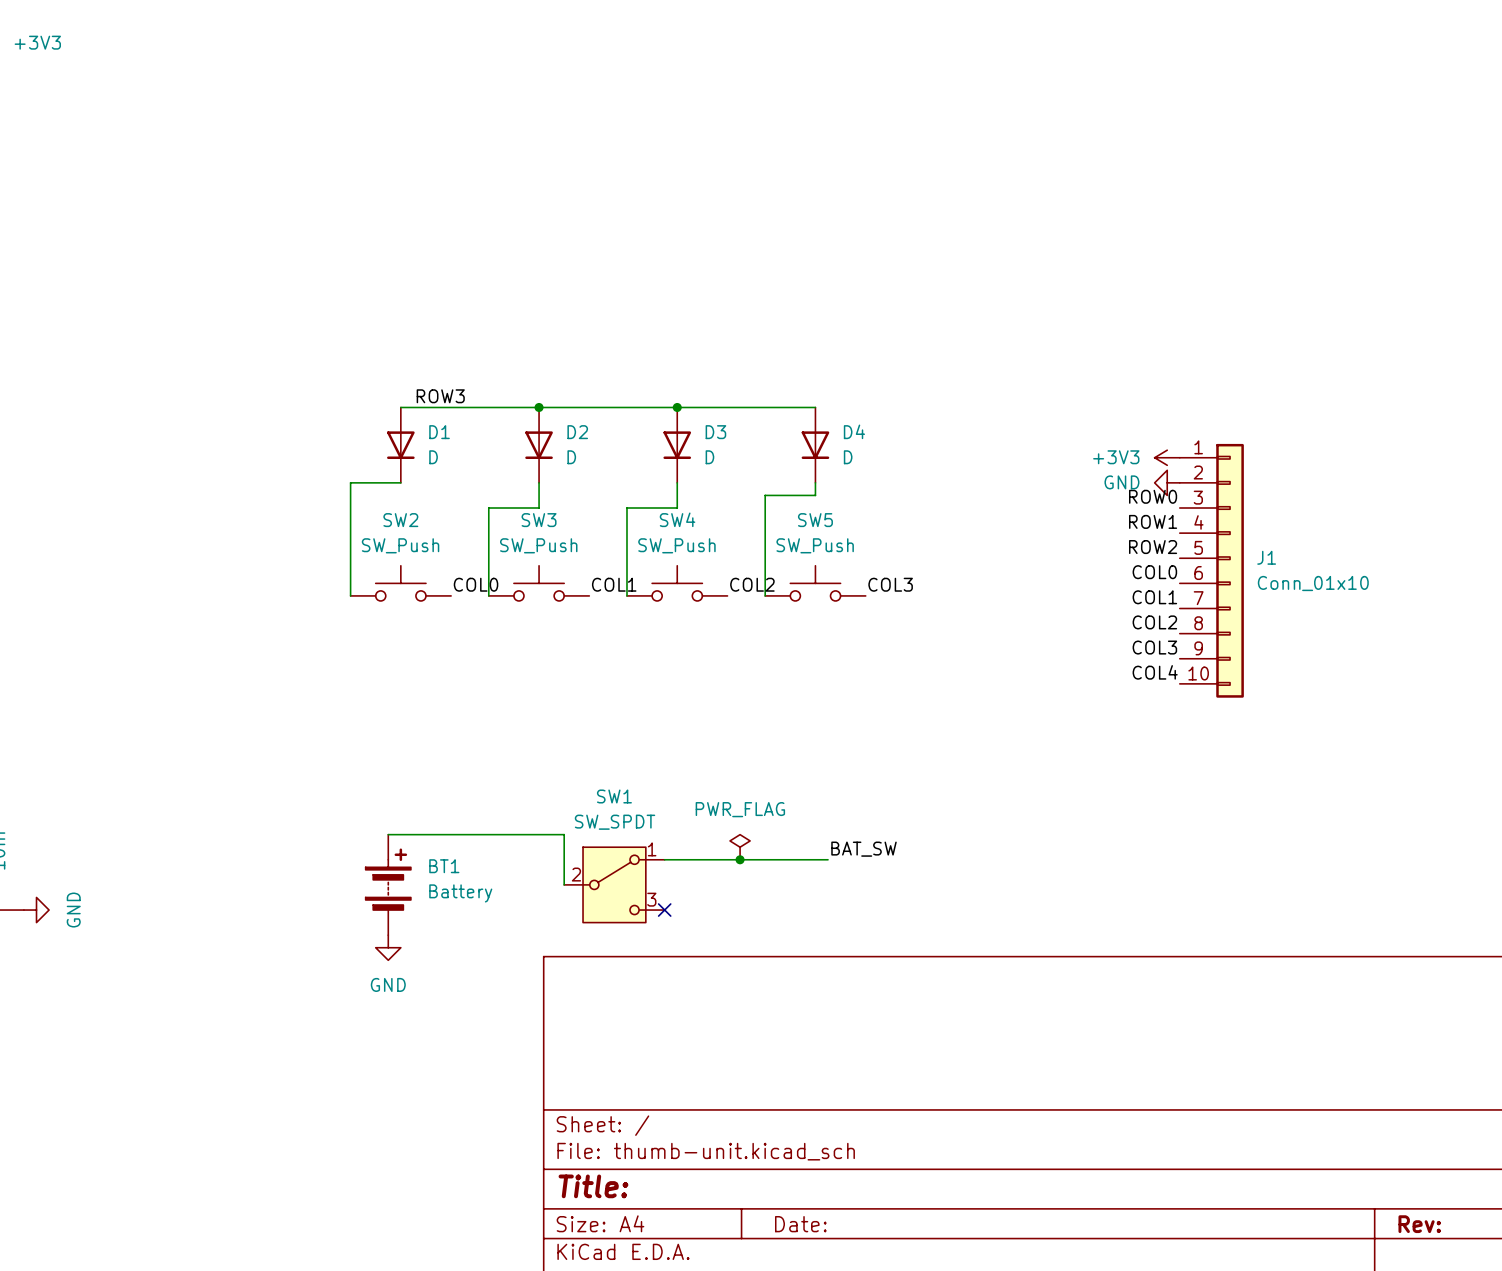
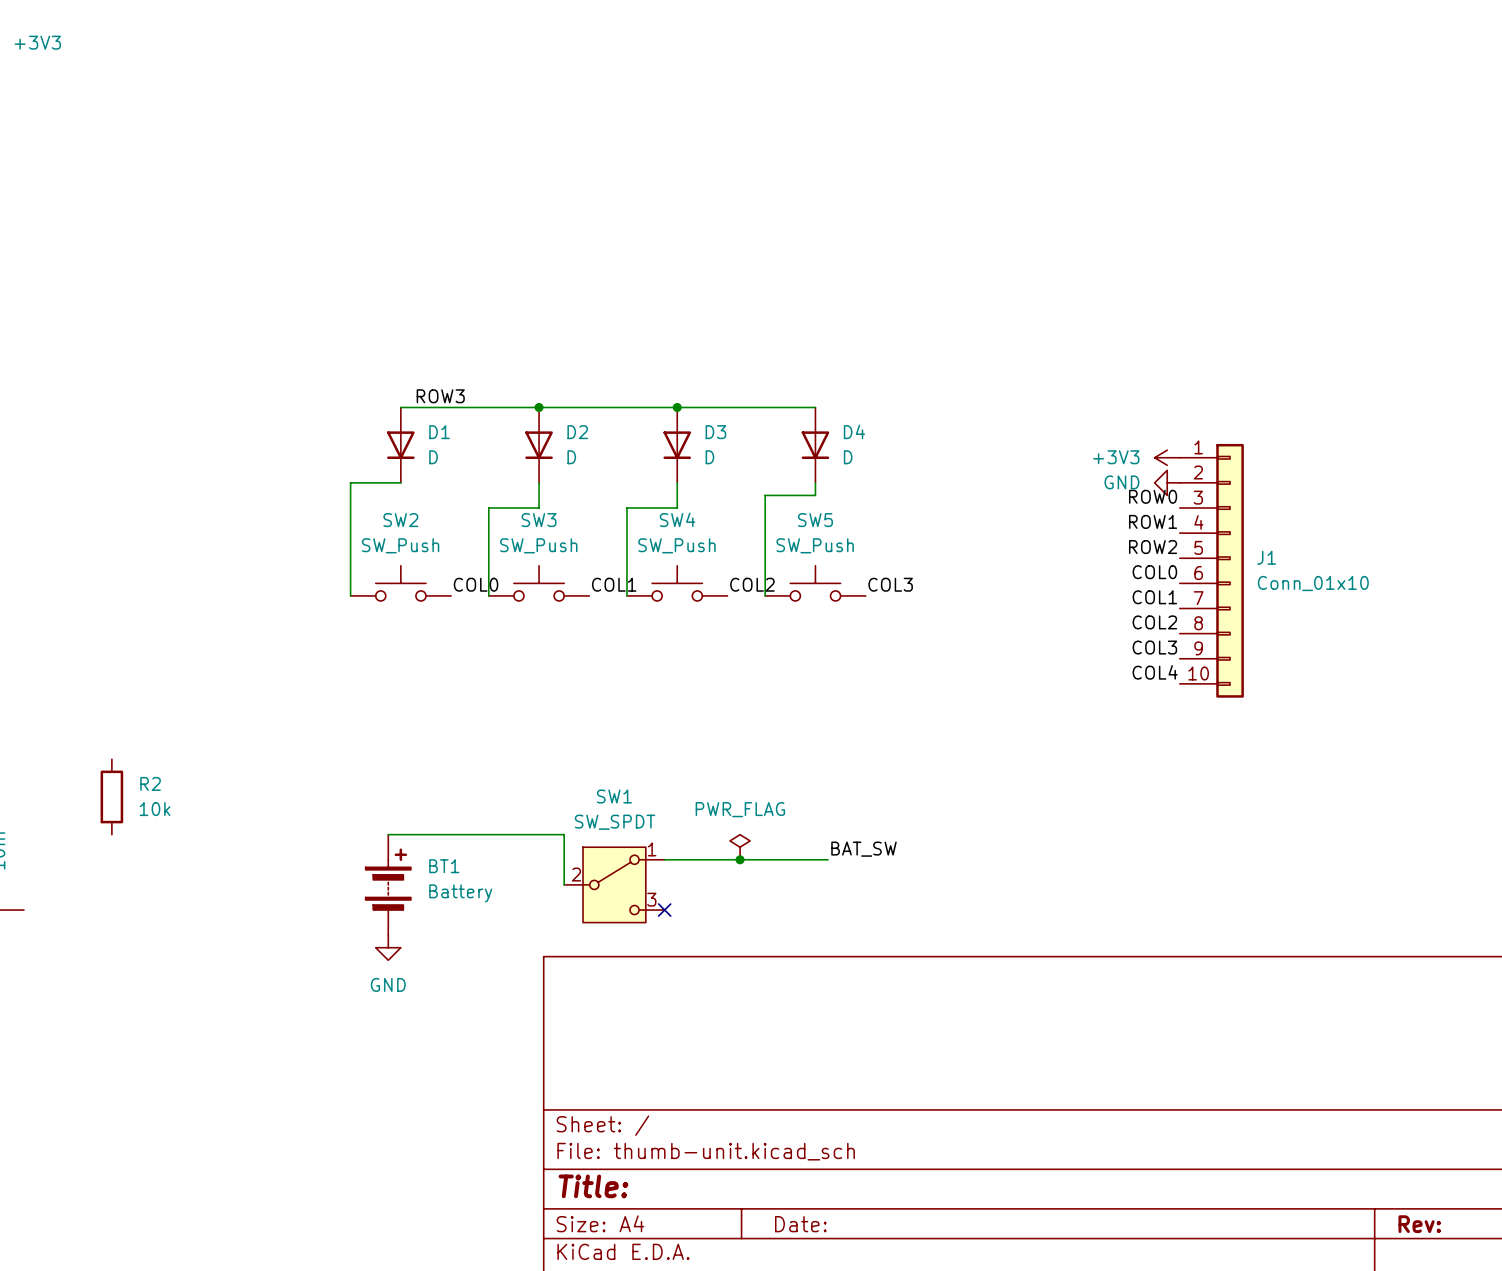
R2: none -> 10k (111, 796)
power symbol: GND (36, 910) -> none

